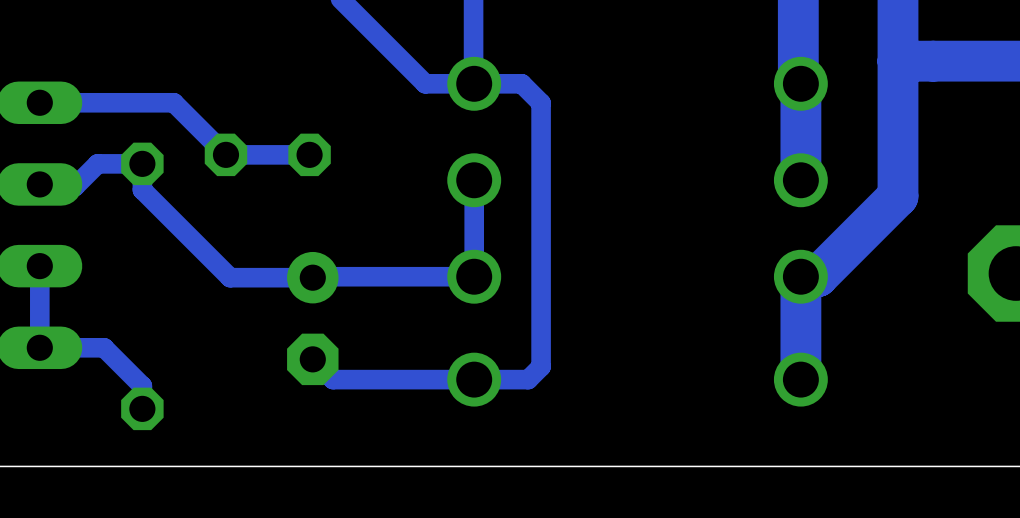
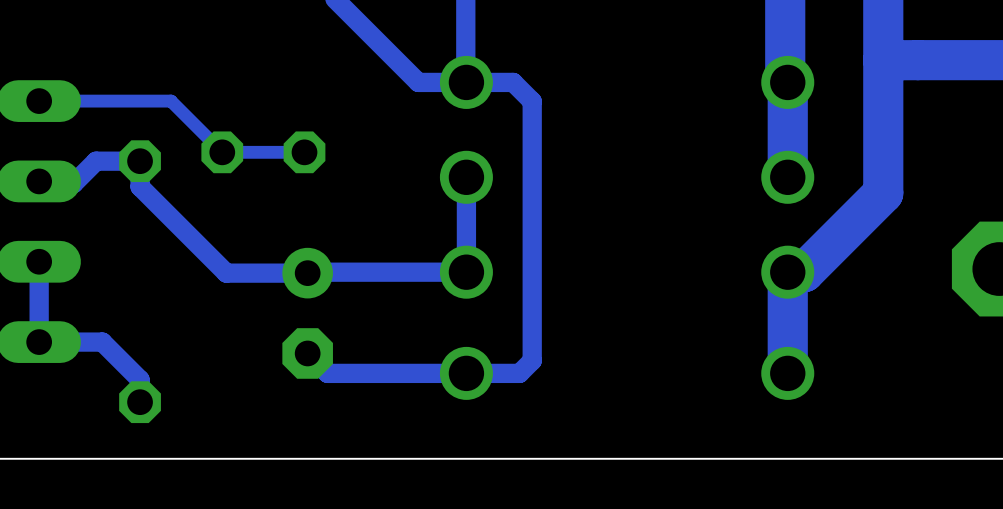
track width: thick (39, 102) (173, 102) (225, 154) (309, 154) -> thin (39, 101) (171, 101) (222, 152) (304, 152)

